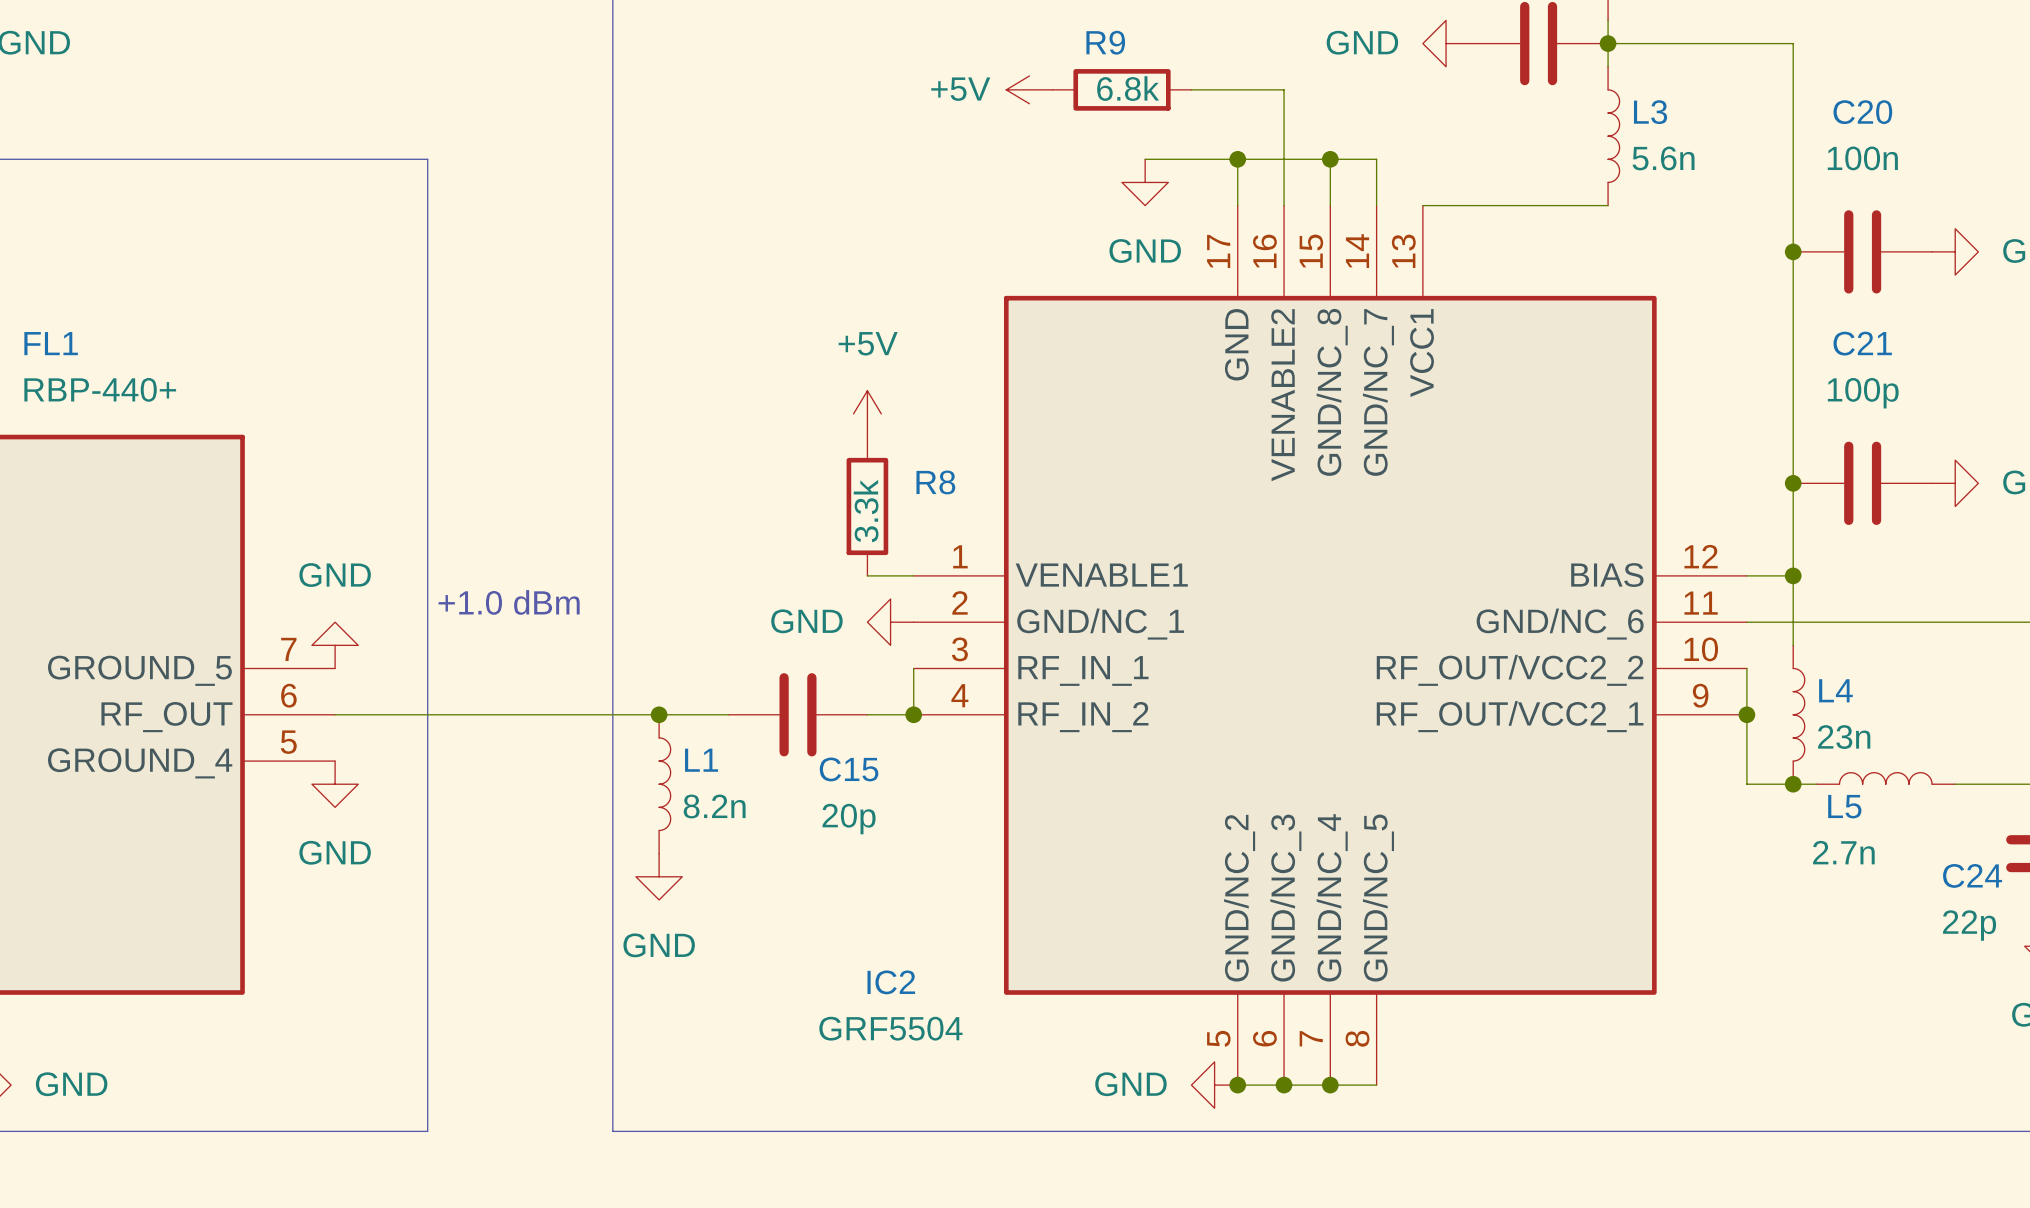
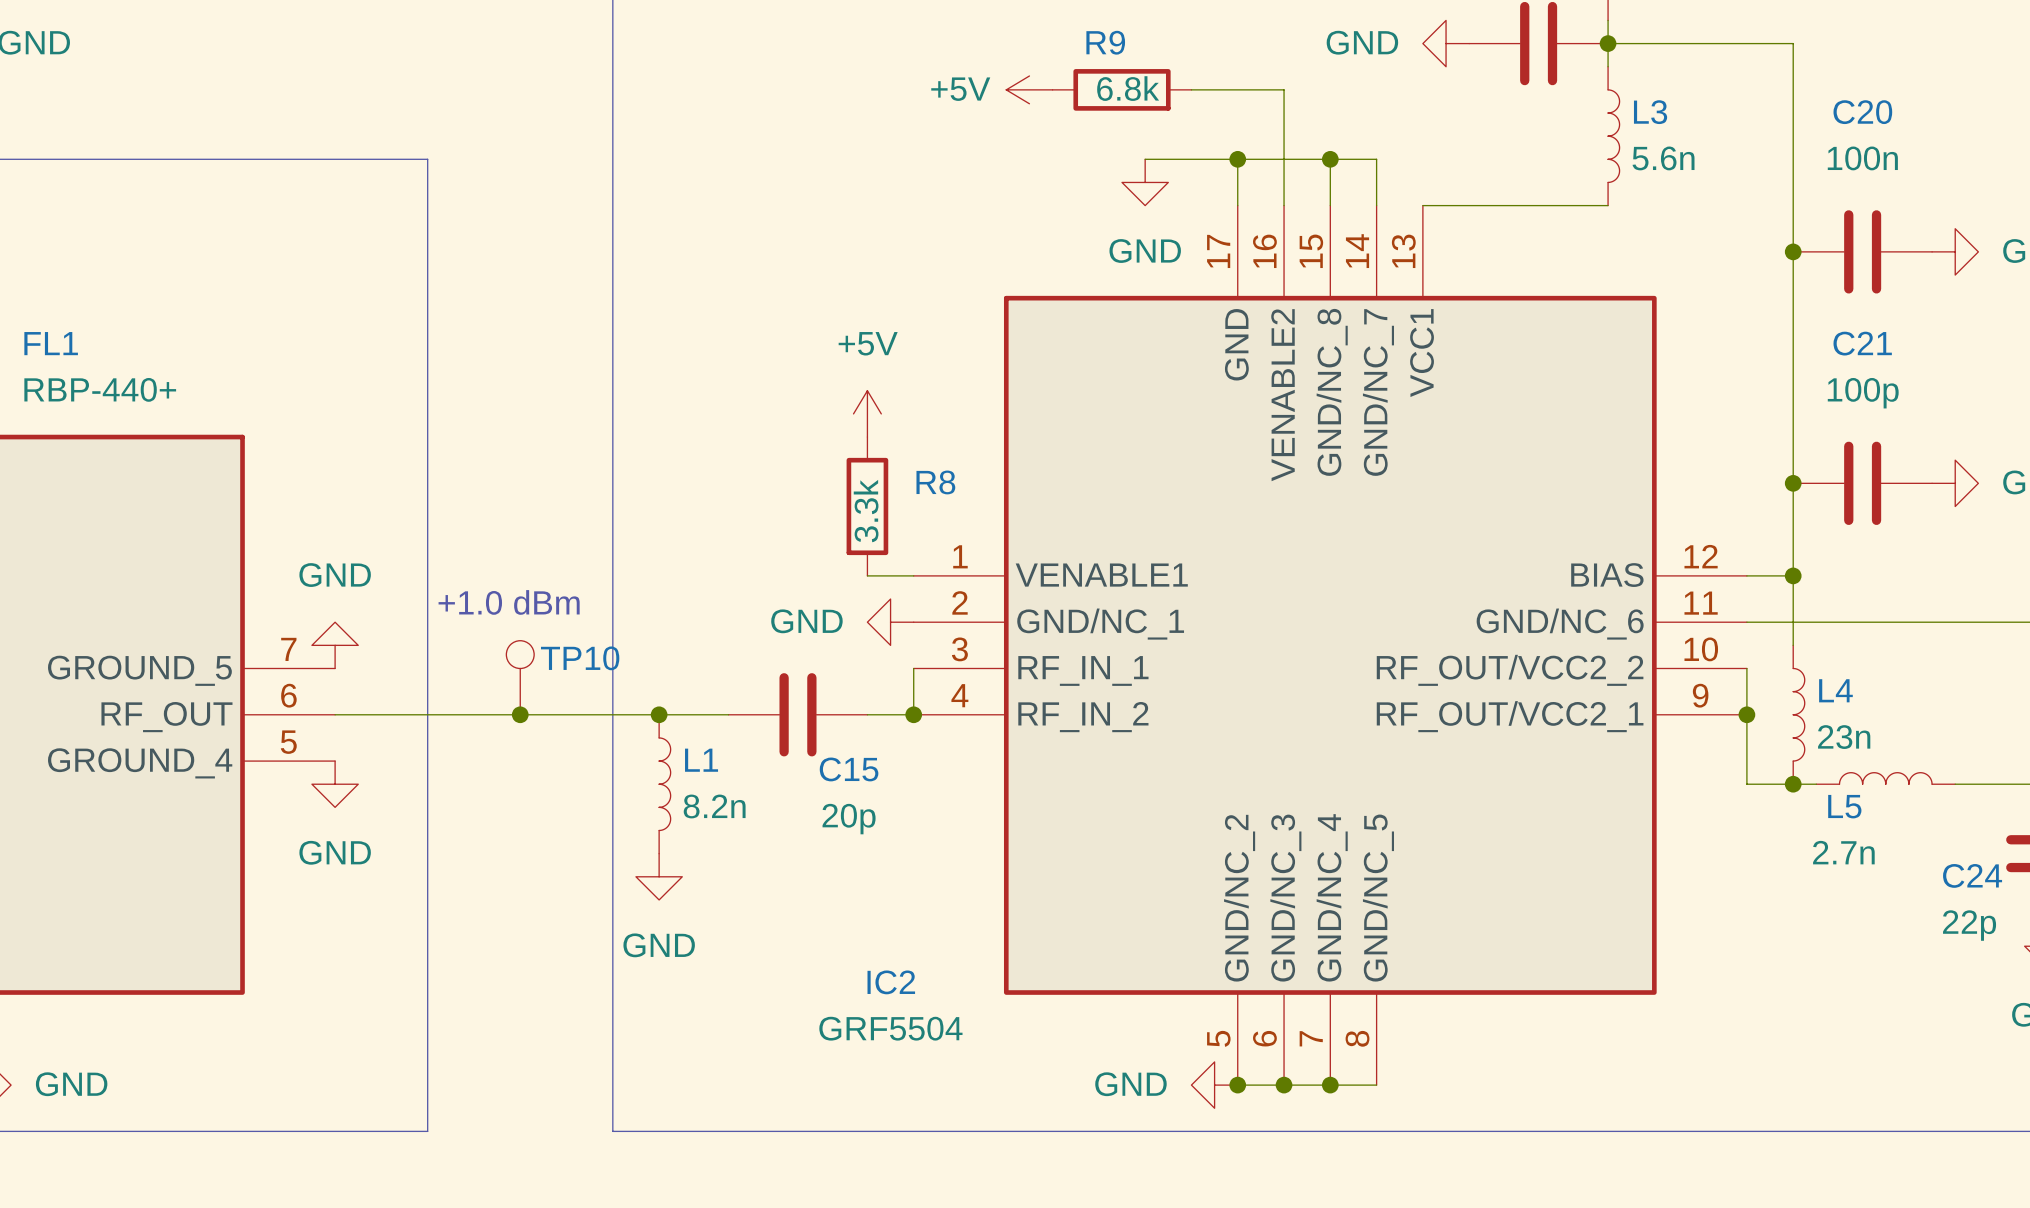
TP10: none -> (520, 677)
junction: none -> (520, 714)

